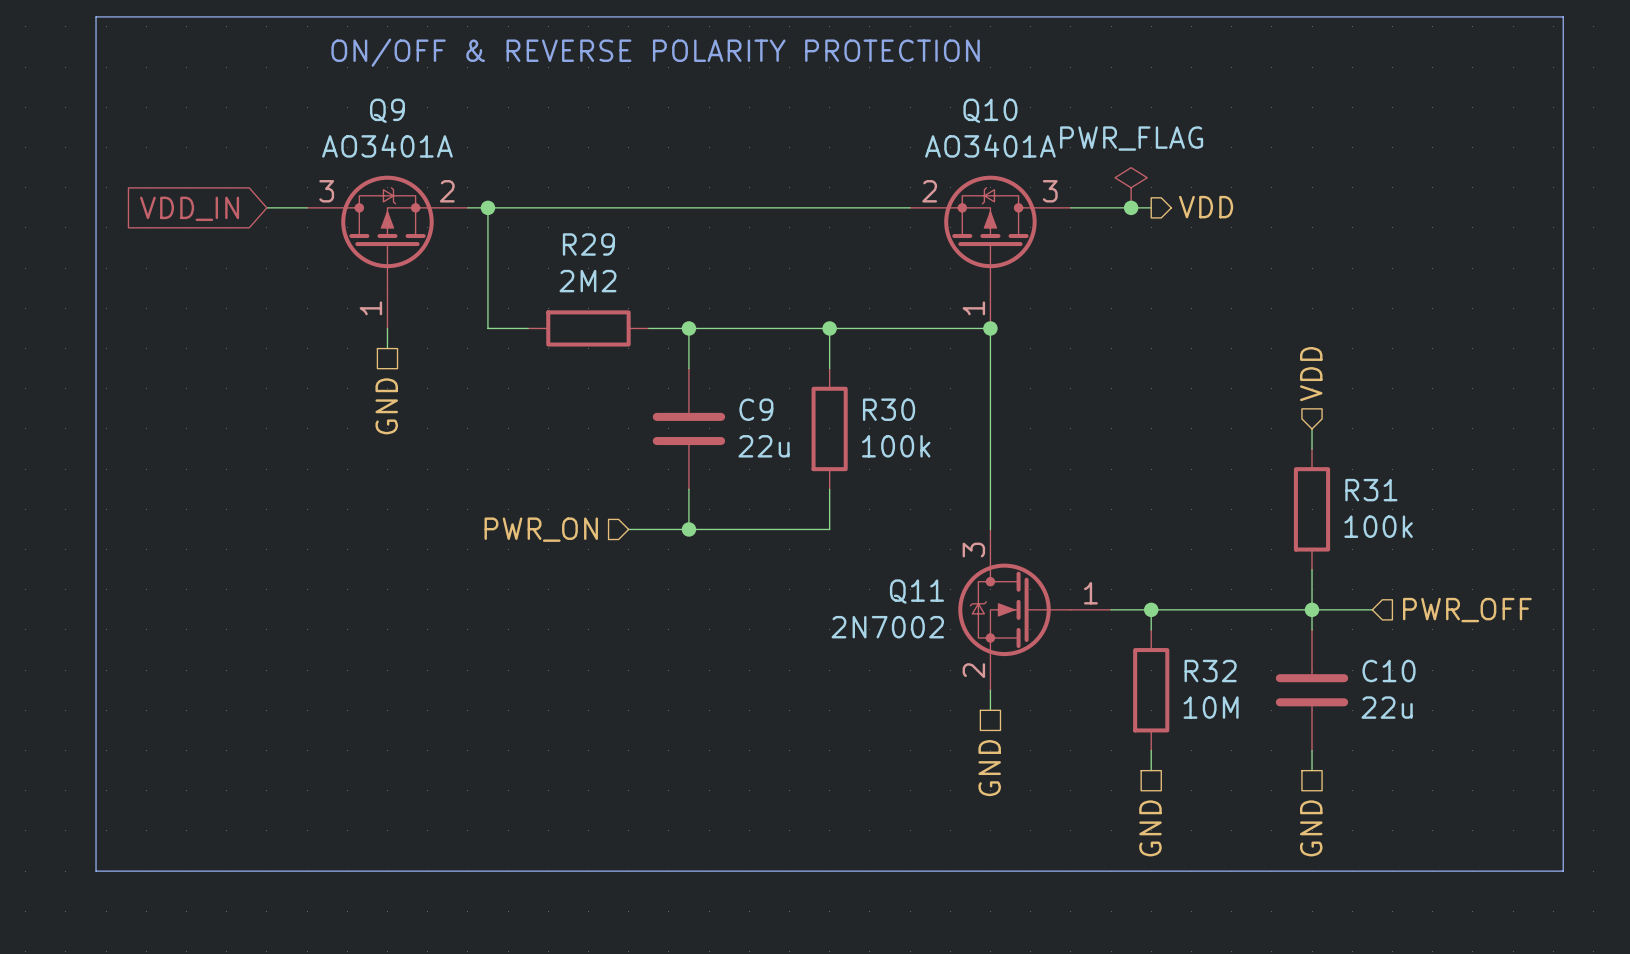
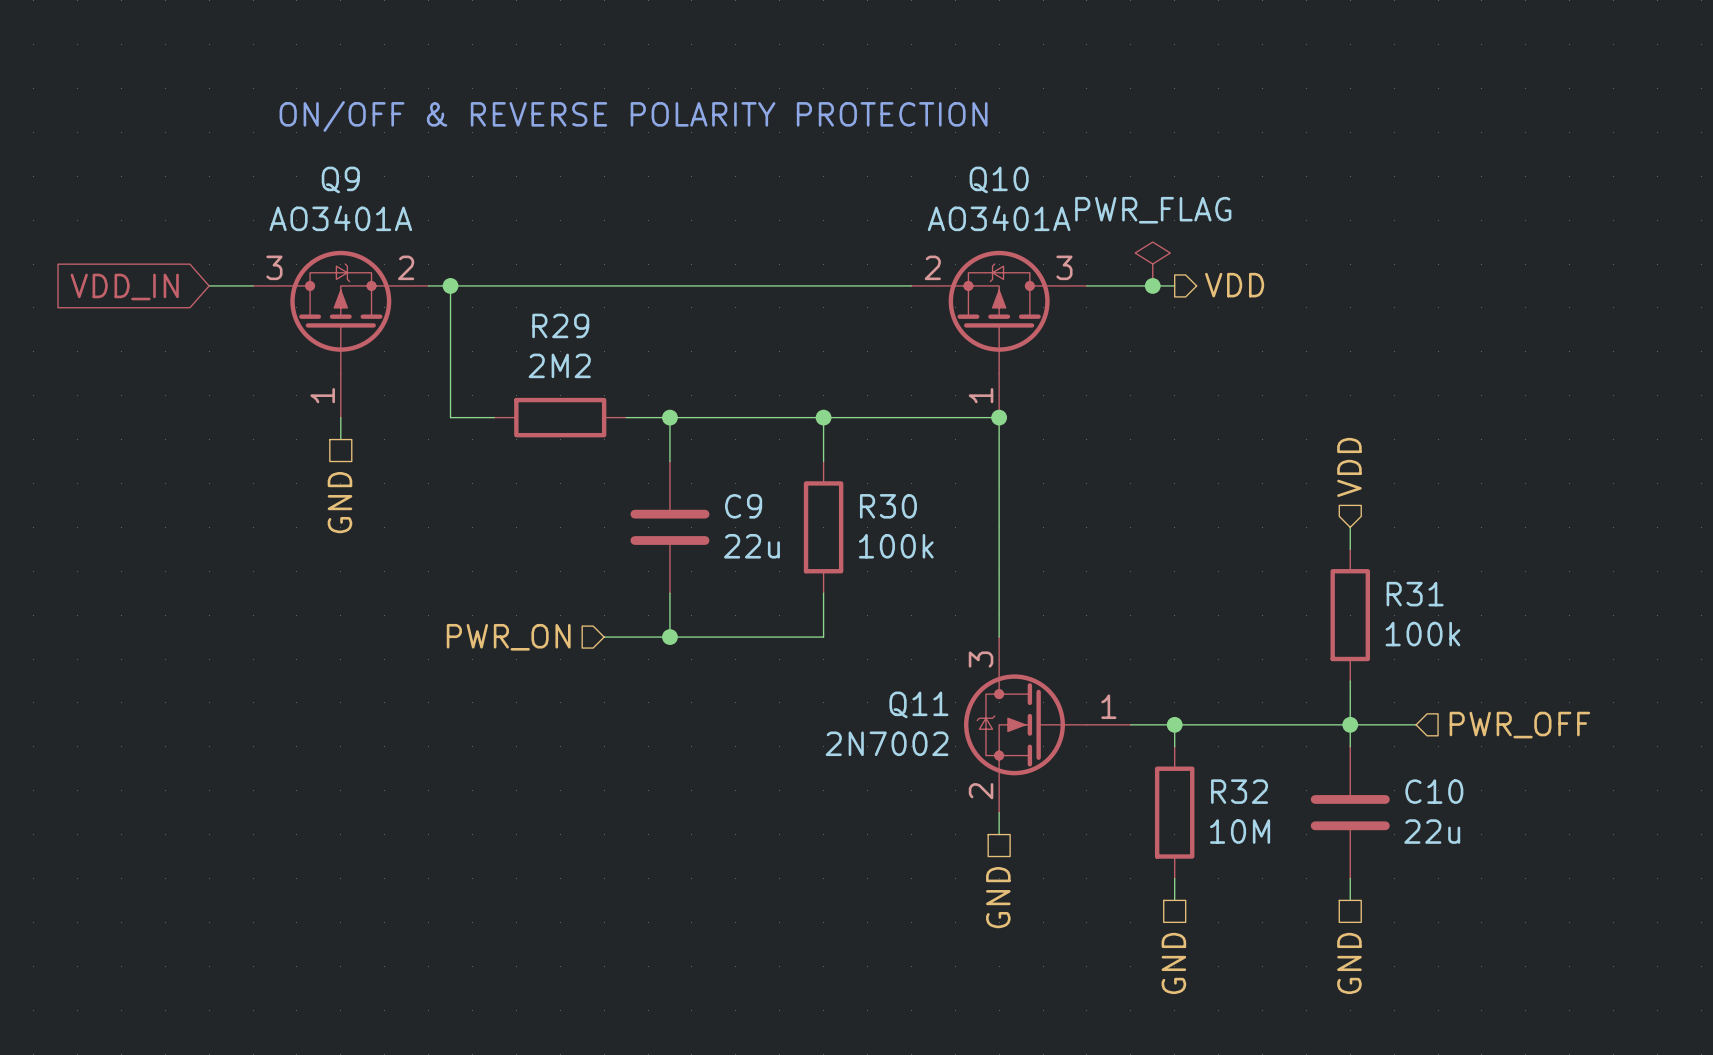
line: (96, 16) (96, 871) (1563, 871) (1563, 16) (96, 16) -> none

